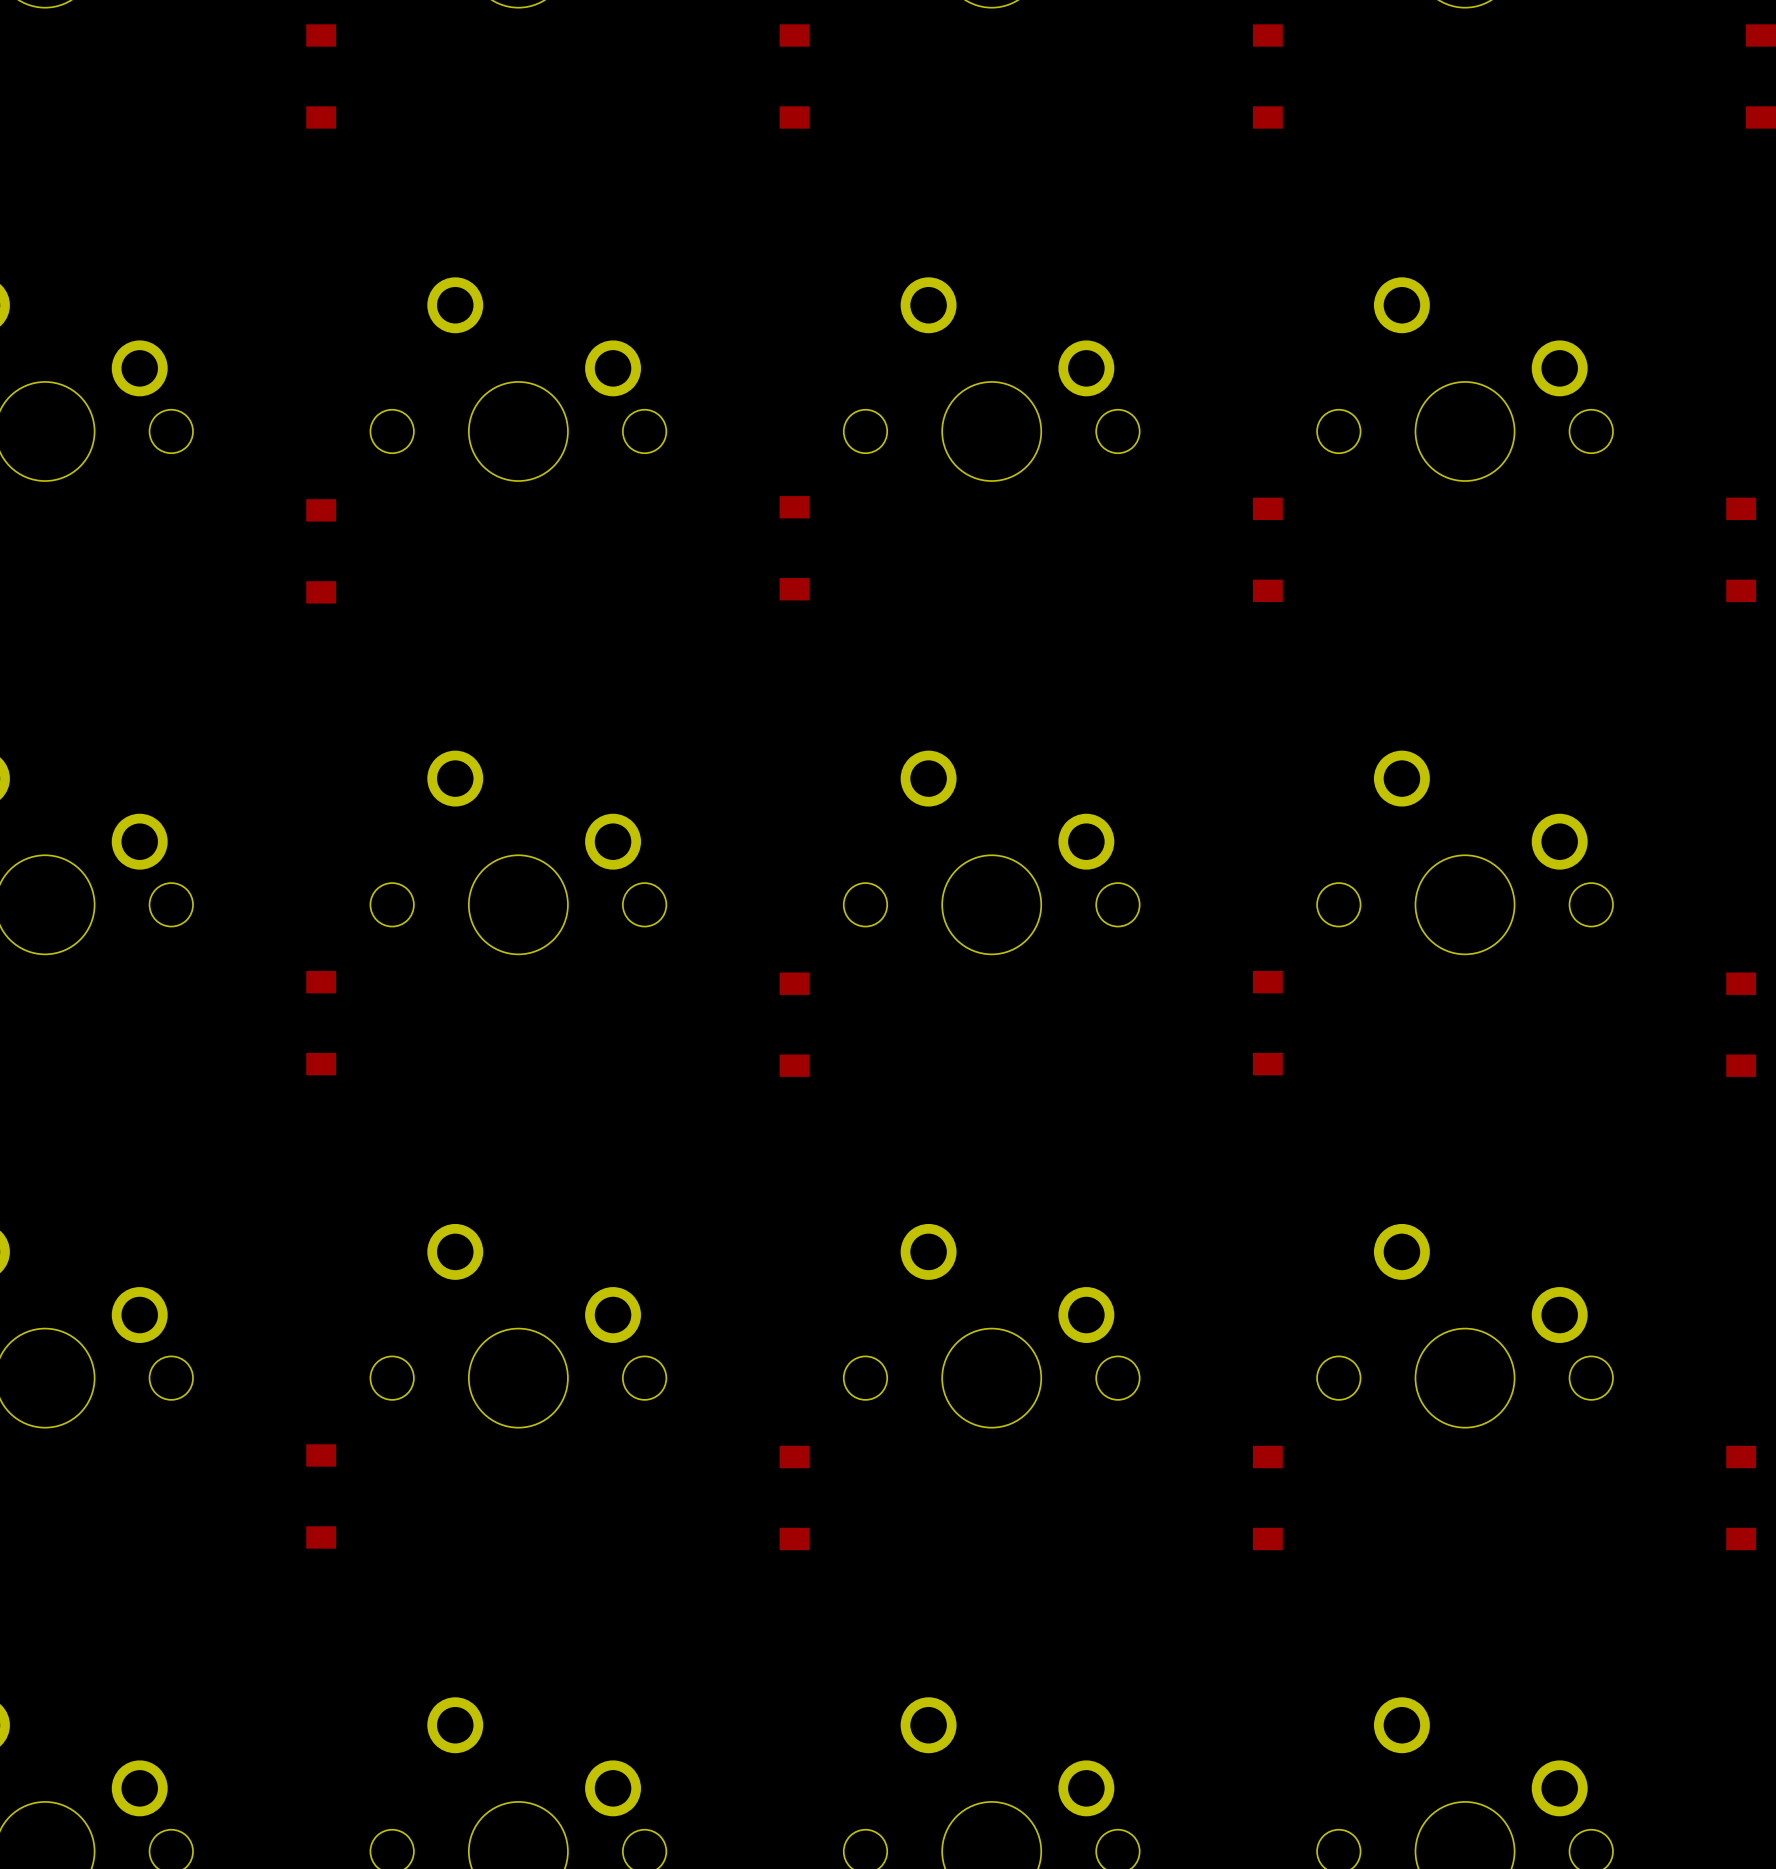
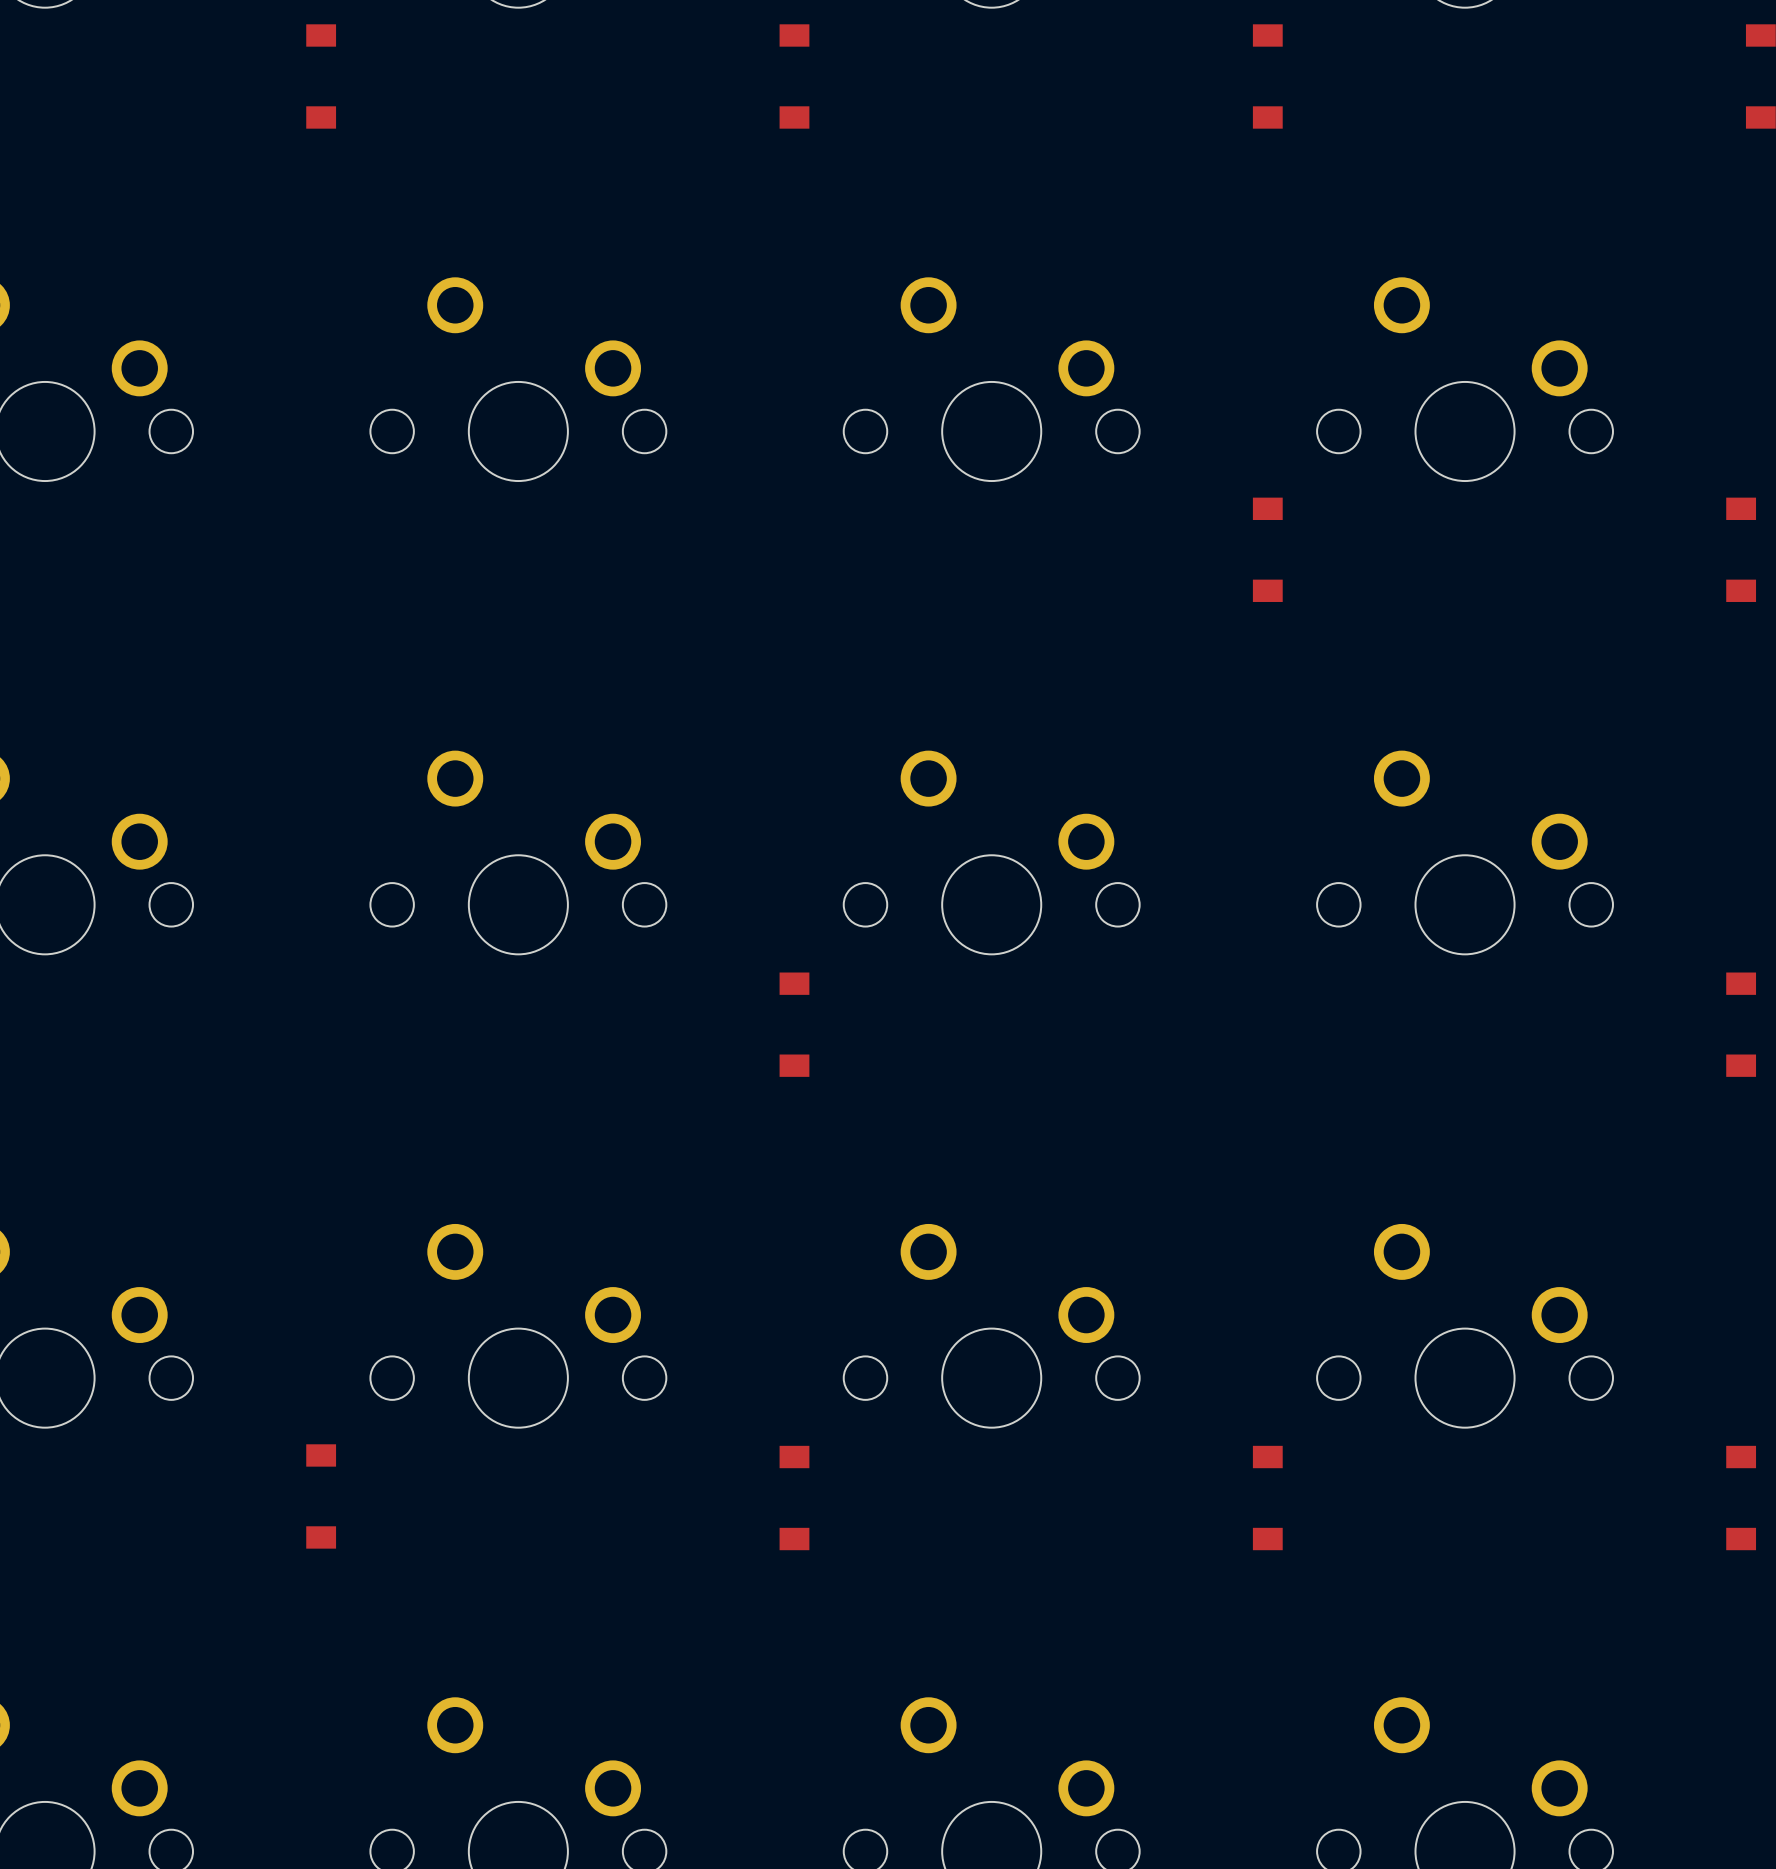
part: (794, 548) -> none
part: (321, 551) -> none
part: (321, 1023) -> none
part: (1267, 1023) -> none

